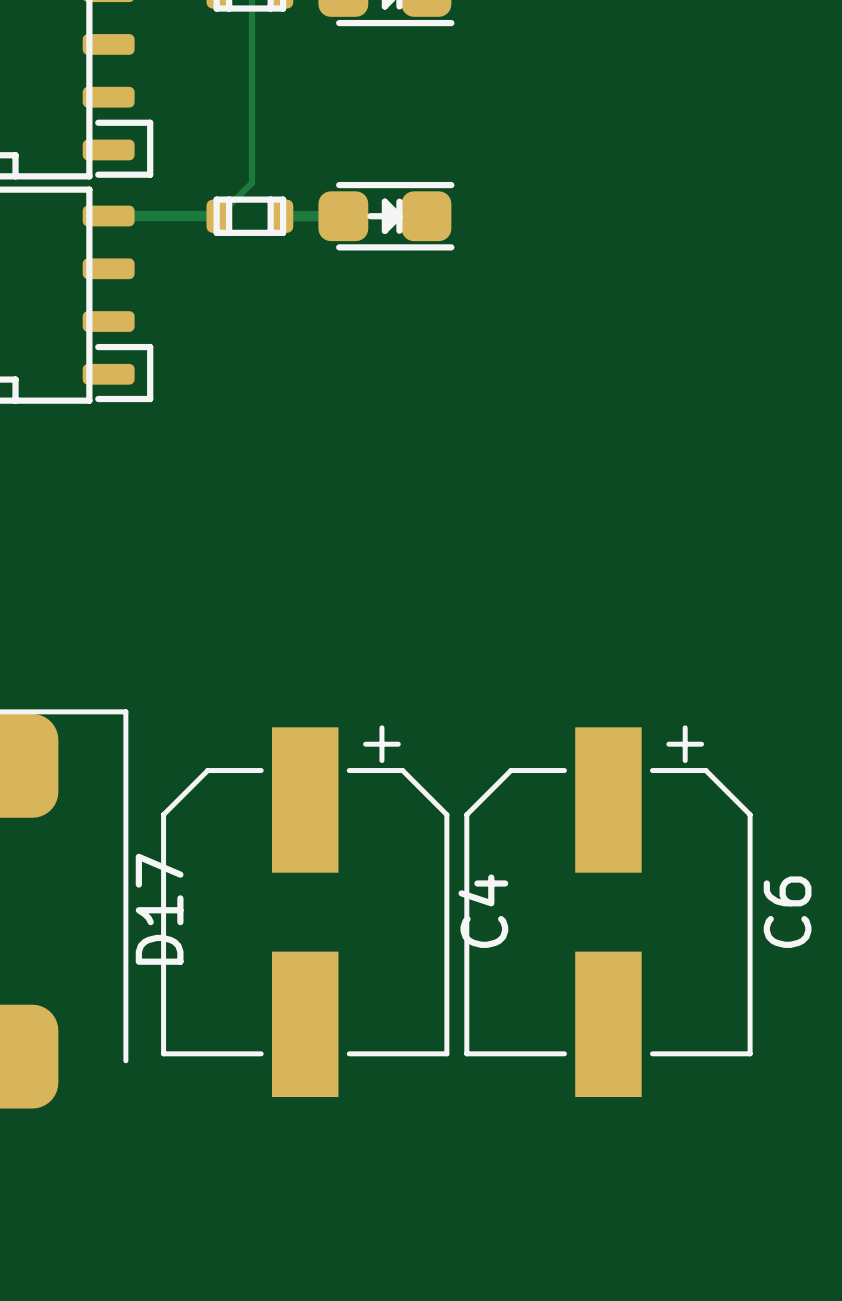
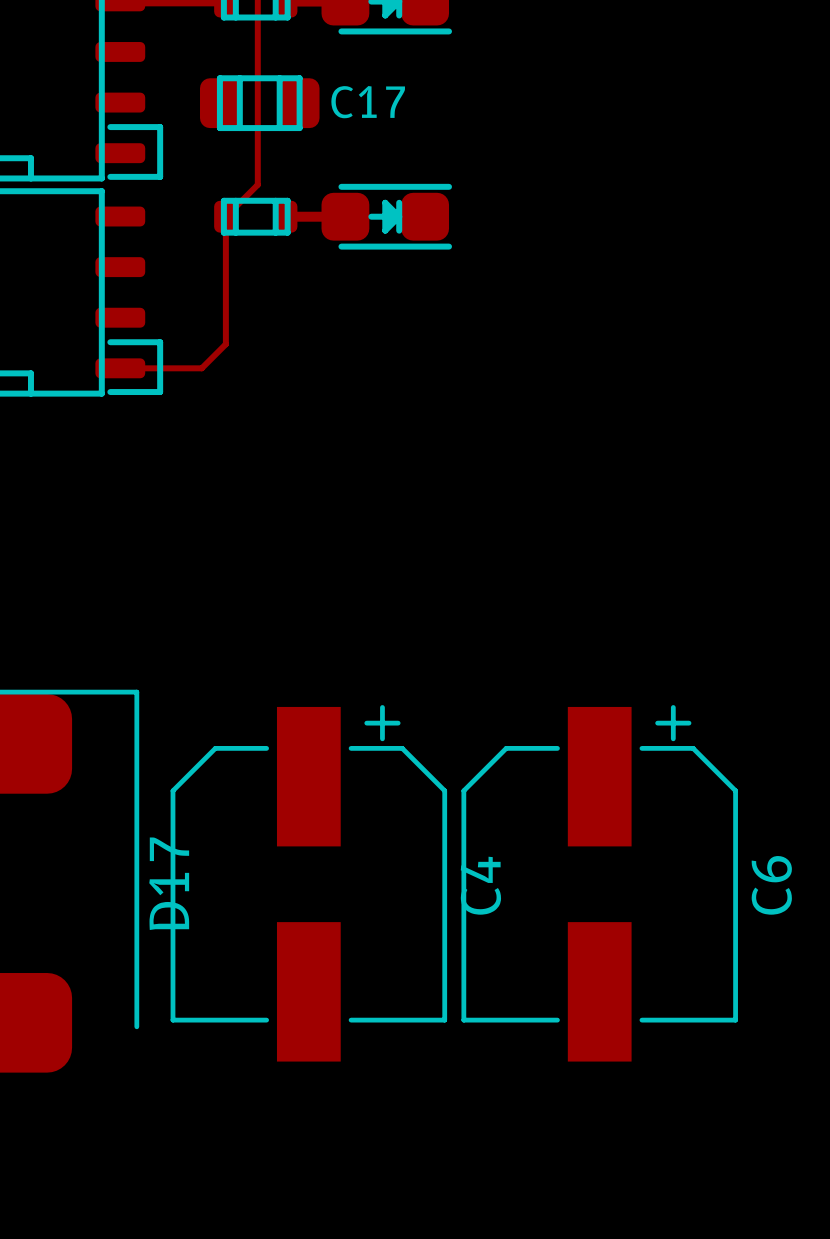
C17: none -> (259, 103)
track: (108, 216) (218, 216) -> (120, 368) (201, 368) (225, 344) (225, 216)

